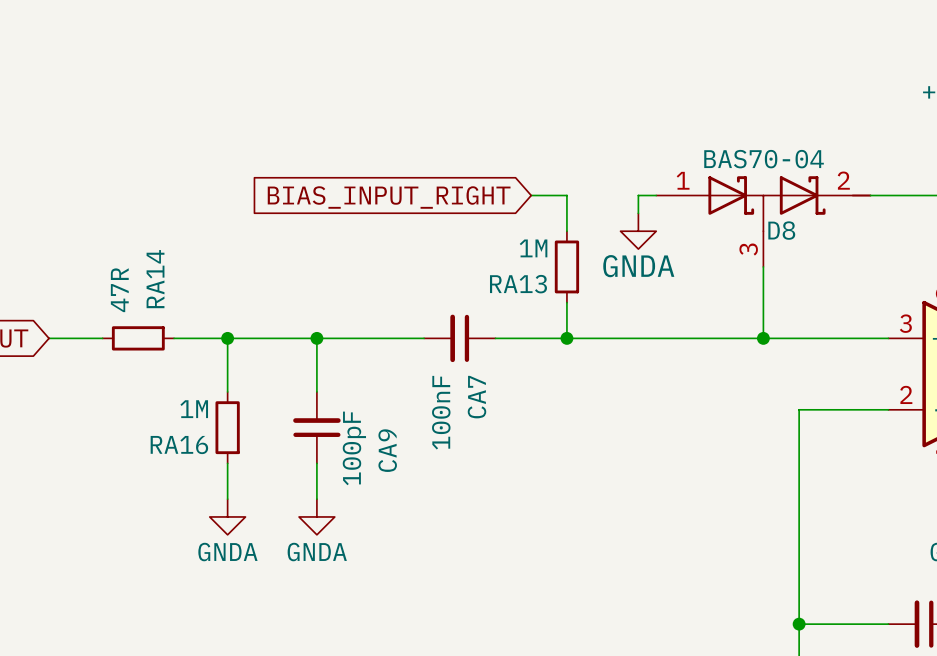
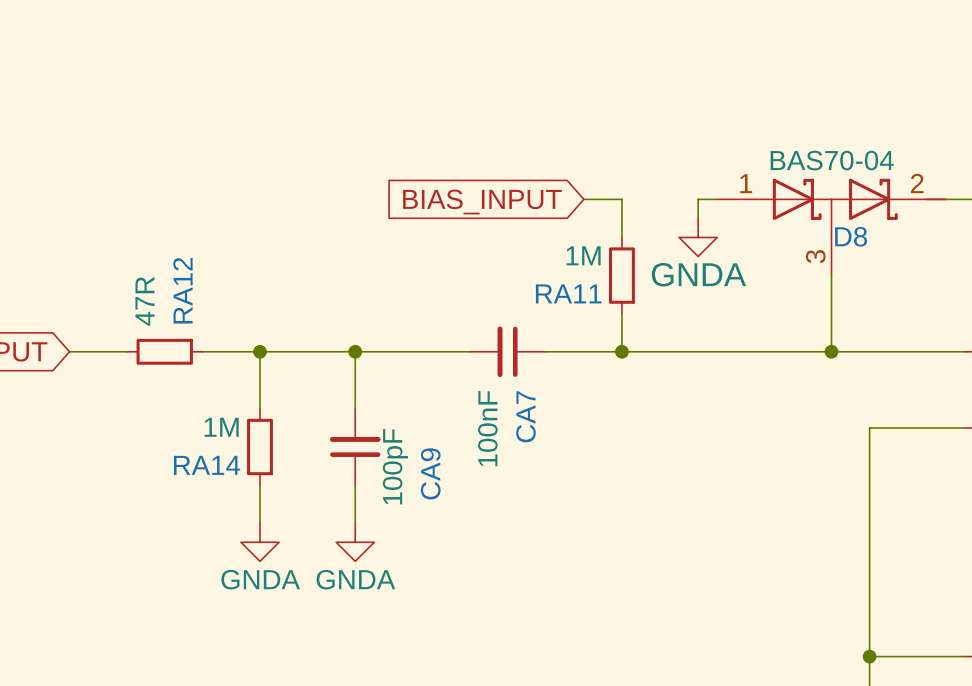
global label: BIAS_INPUT_RIGHT (389, 197) -> BIAS_INPUT (482, 201)
RA14 name: RA14 (155, 279) -> RA12 (182, 290)
RA13 name: RA13 (518, 284) -> RA11 (568, 293)
RA16 name: RA16 (179, 445) -> RA14 (207, 465)

